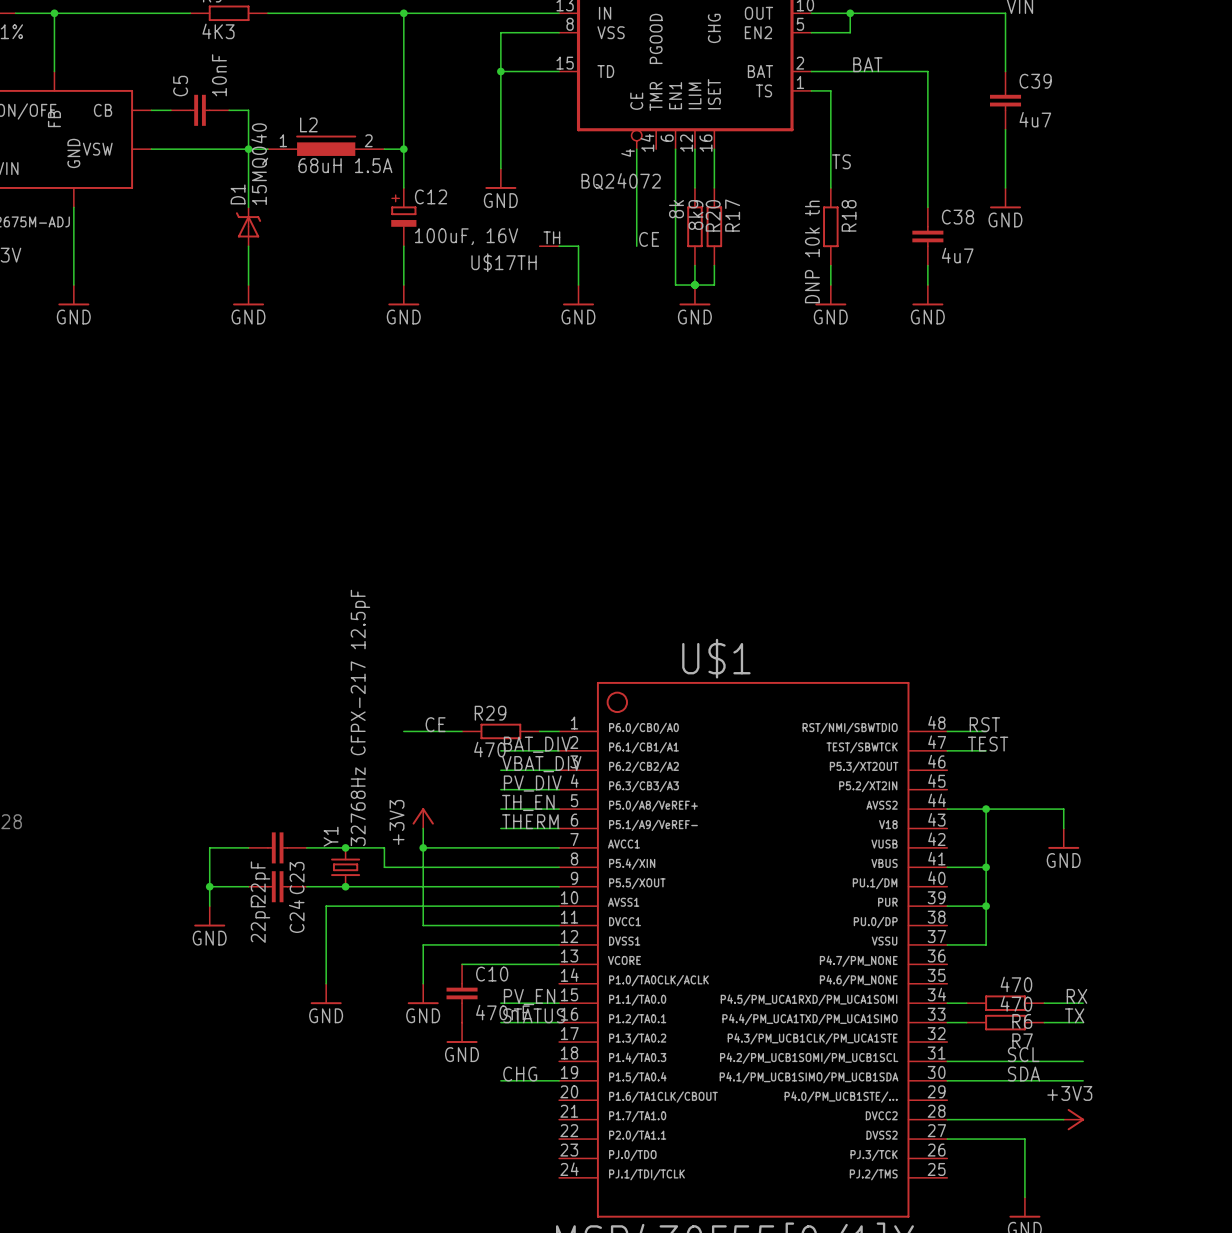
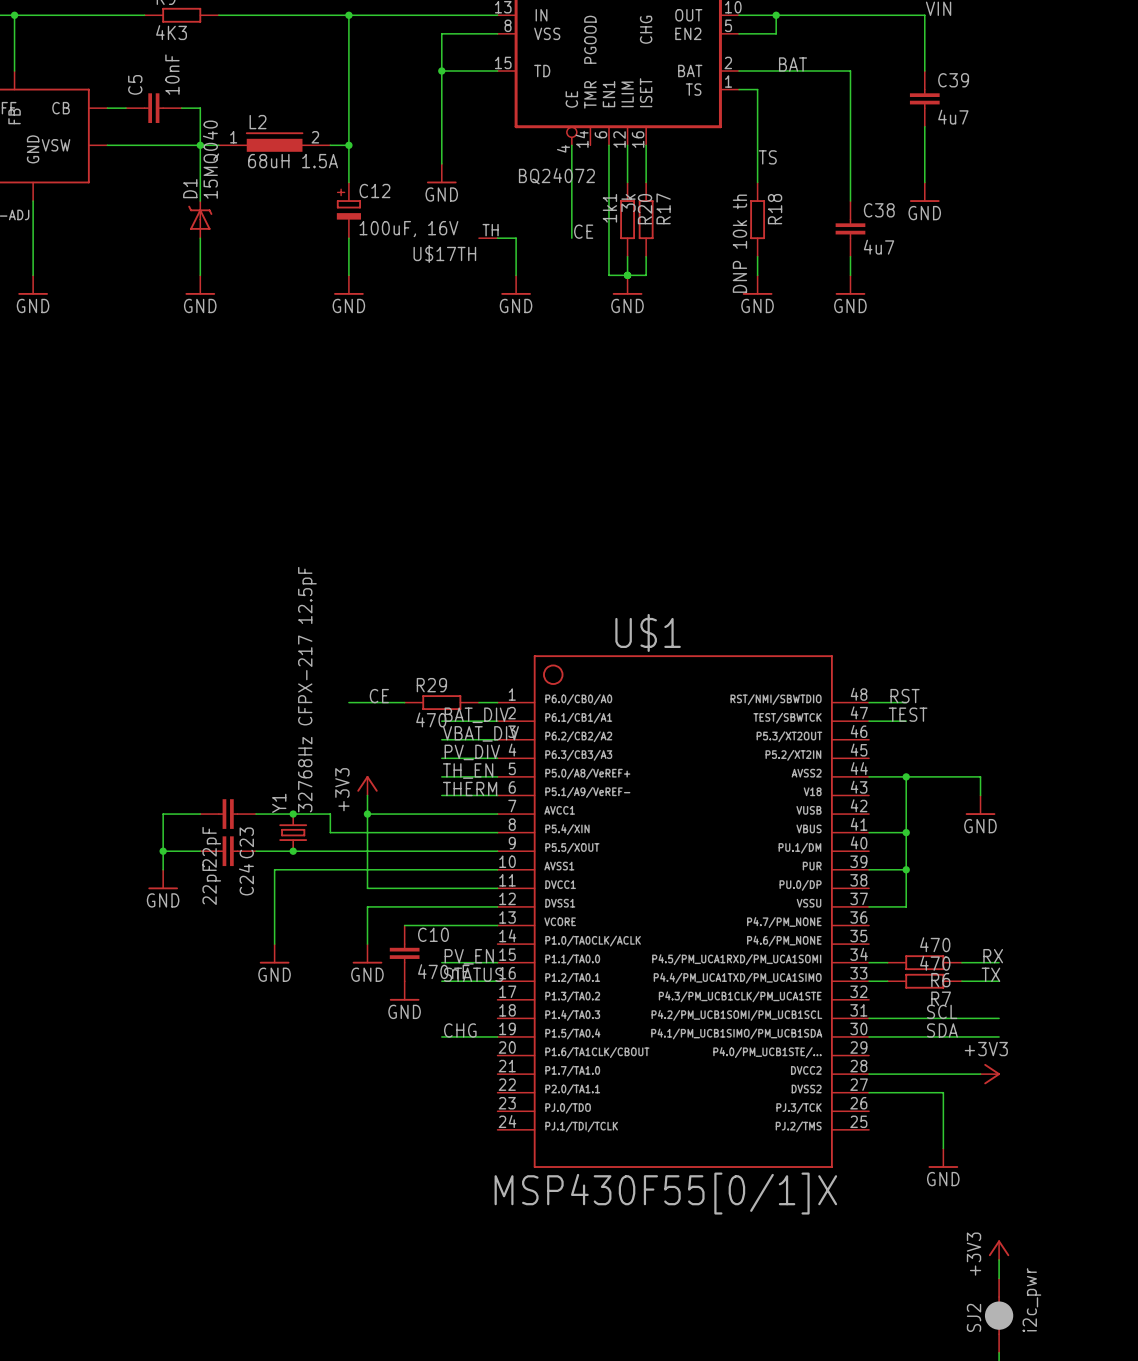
R20 value: 8k (676, 209) -> 1k1 (609, 208)
R17 value: 8k9 (695, 214) -> 3k (628, 203)

